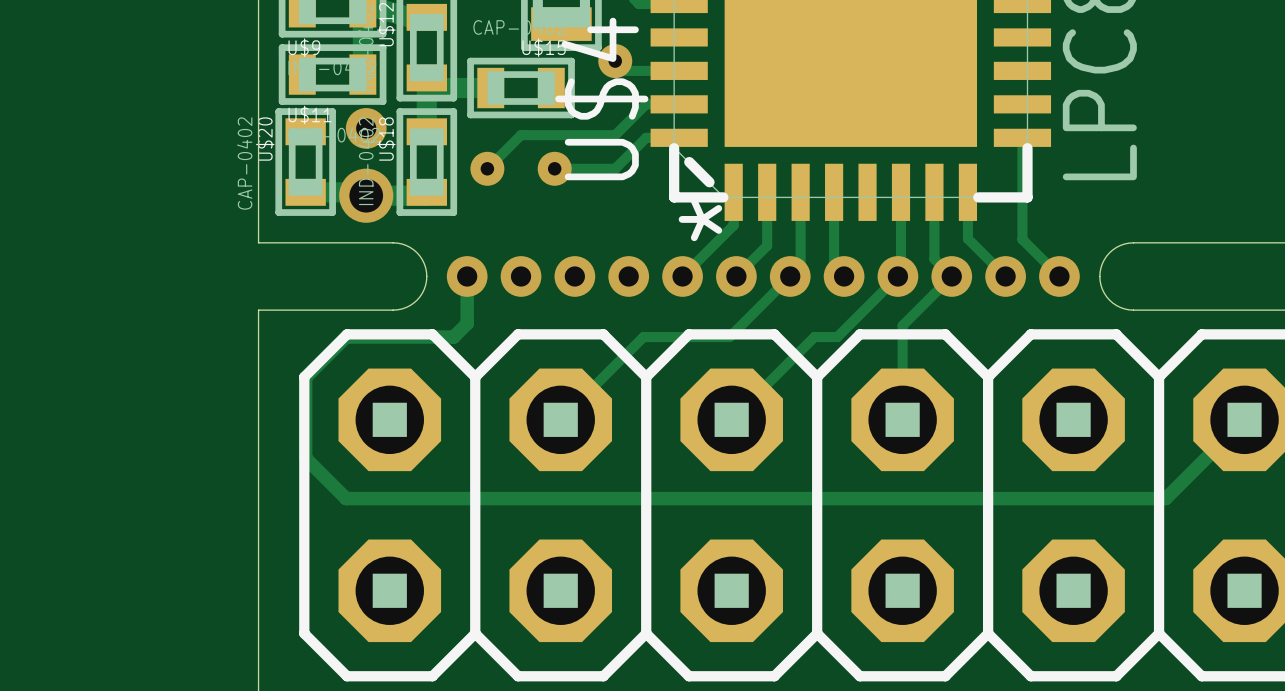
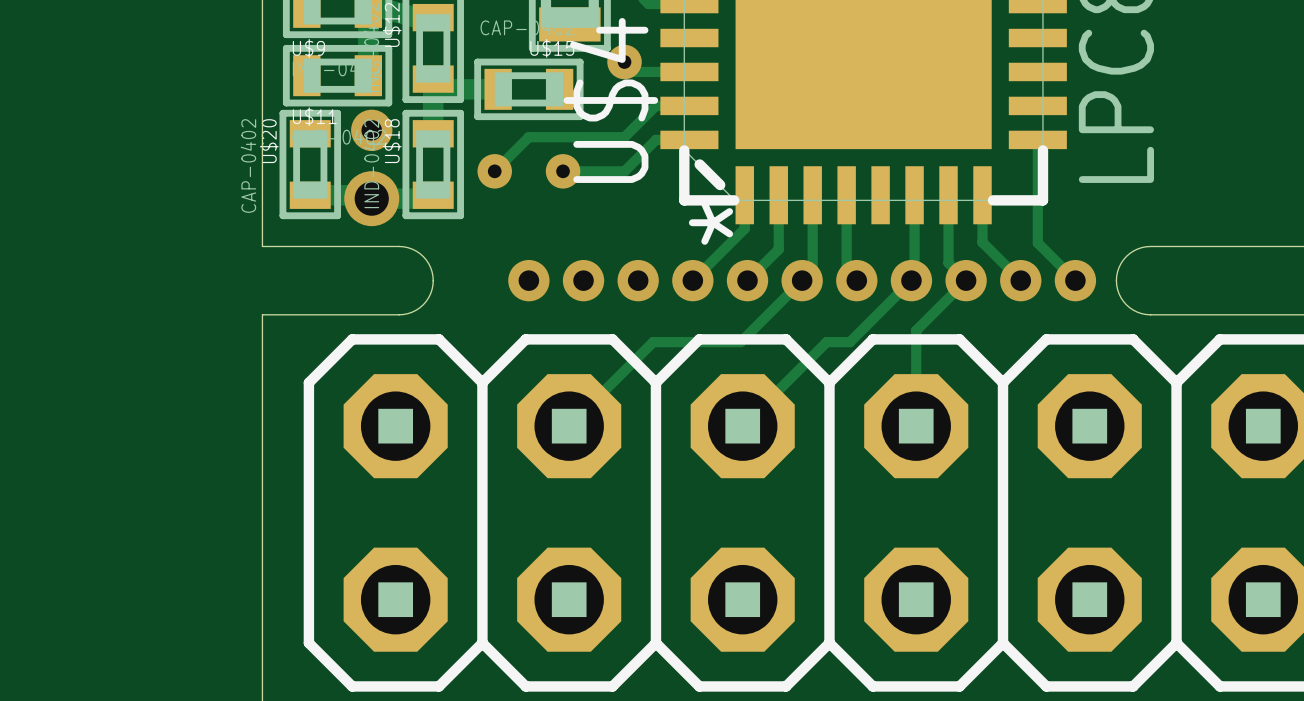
track: (467, 276) (467, 323) (453, 337) (346, 337) (305, 377) (305, 458) (346, 498) (1165, 498) (1244, 419) -> none
via: (467, 276) -> none

